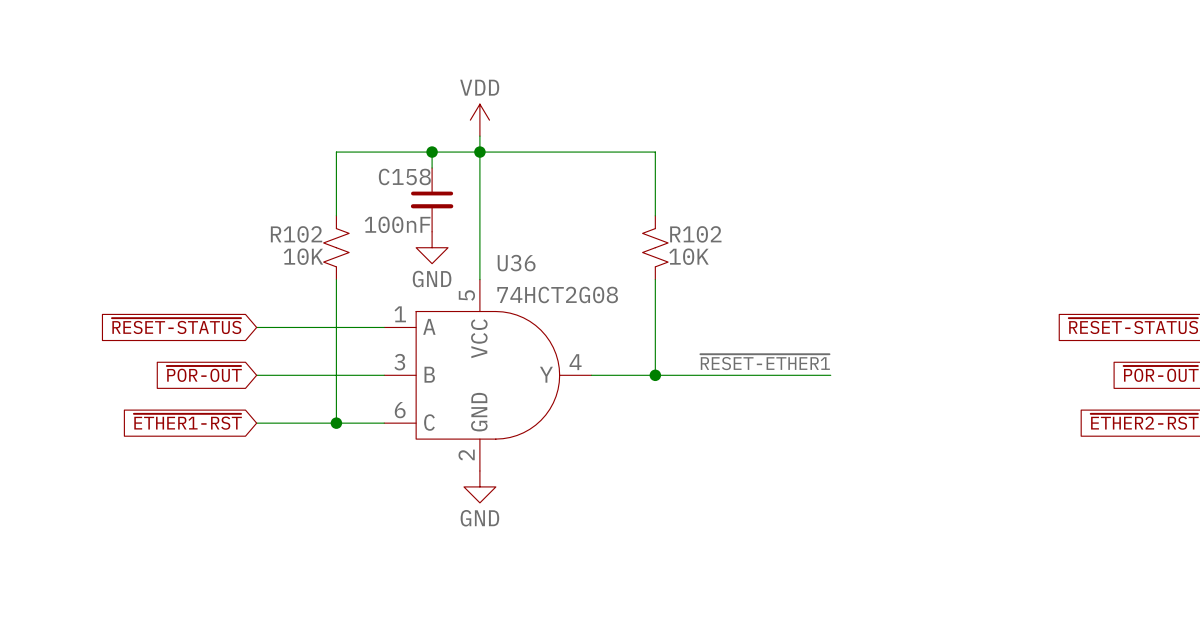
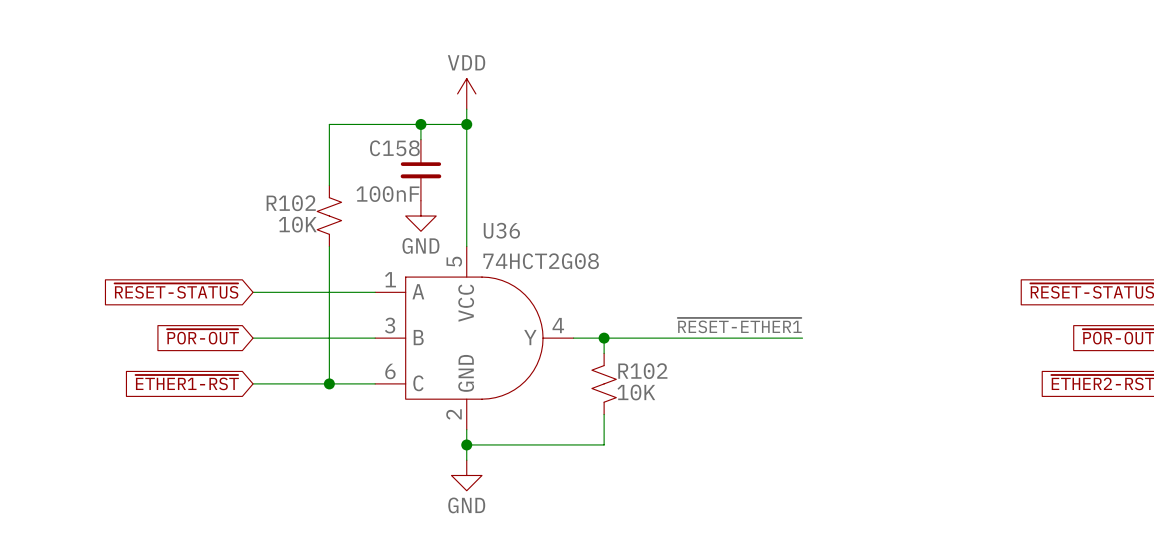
wire: (479, 152) (655, 152) (655, 215) -> none
R102 position: (655, 247) -> (604, 383)
wire: (655, 279) (655, 375) -> none
wire: none -> (604, 338) (604, 353)
junction position: (655, 375) -> (604, 338)
wire: none -> (604, 414) (604, 444) (466, 444)
junction: none -> (466, 444)
power symbol position: GND (479, 486) -> GND (466, 475)

